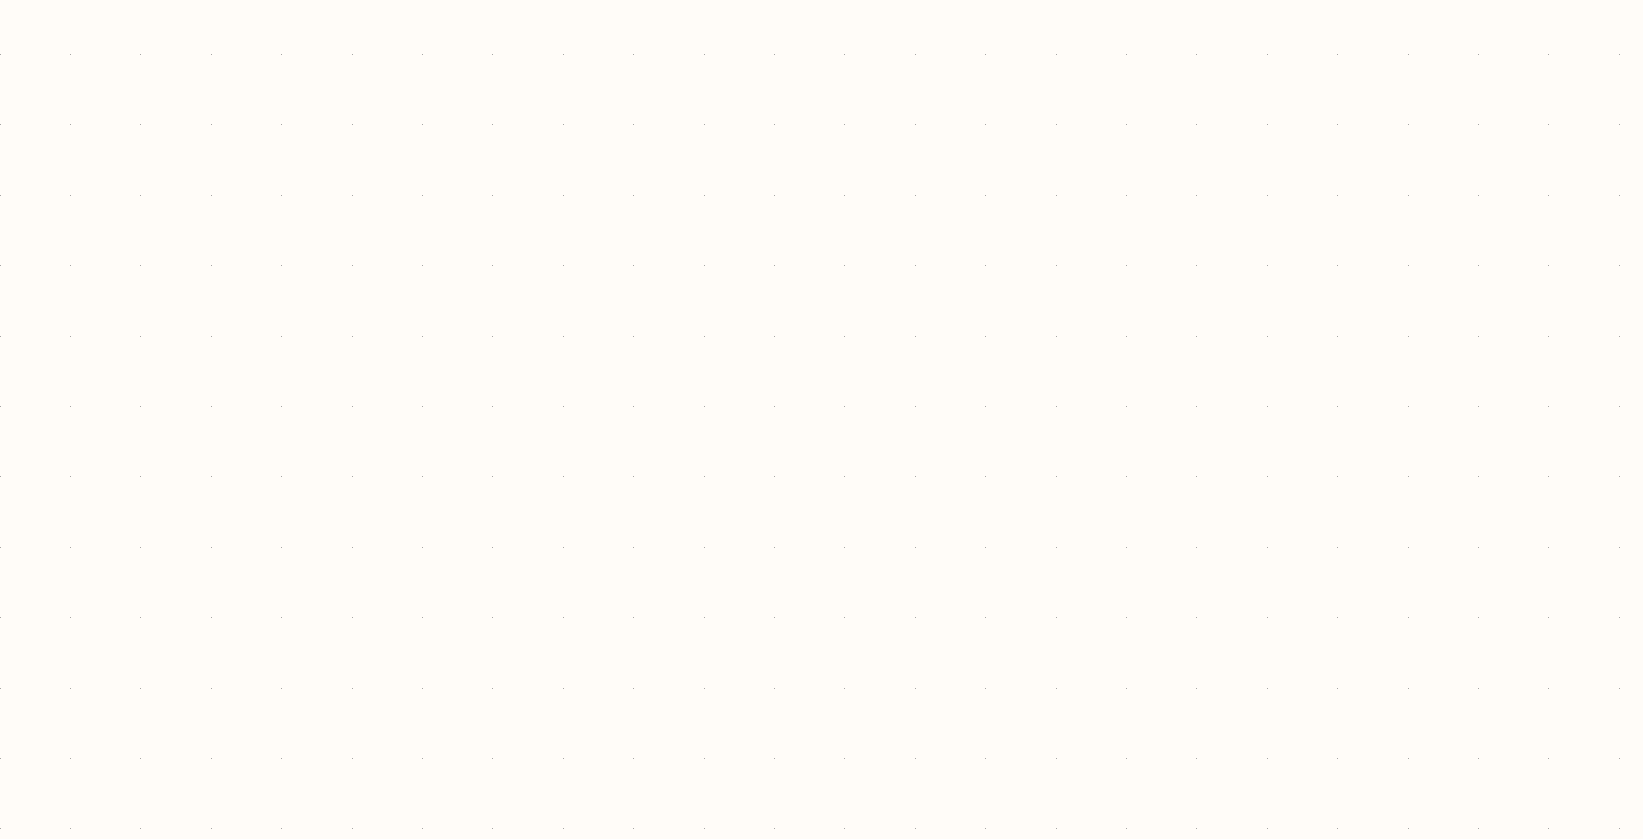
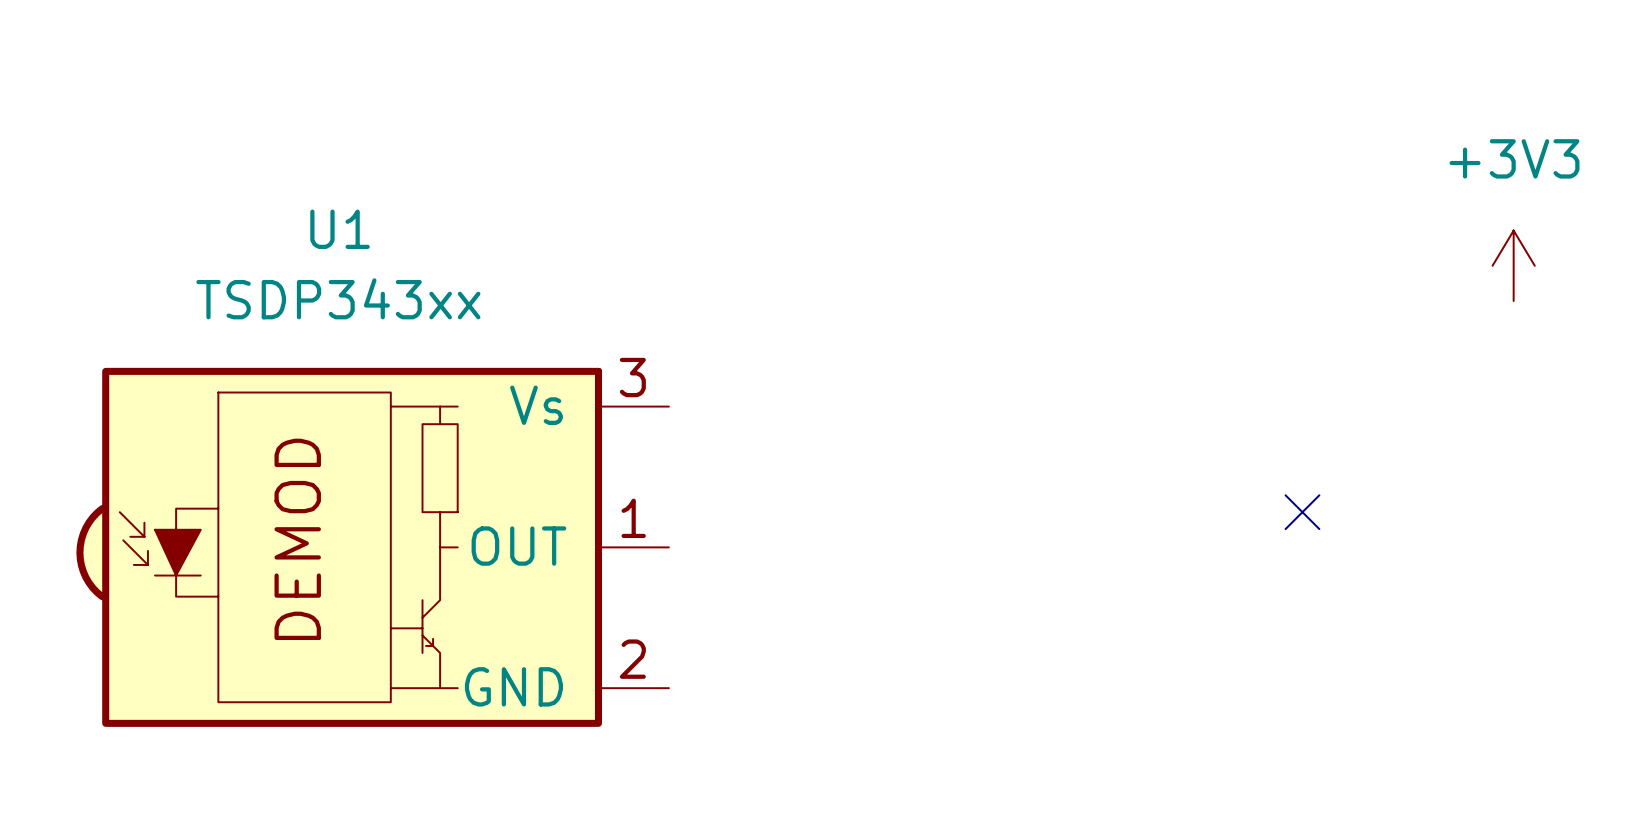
power symbol: none -> +3V3 (1513, 265)
no-connect mark: none -> (1302, 512)
U1: none -> TSDP343xx (372, 547)

